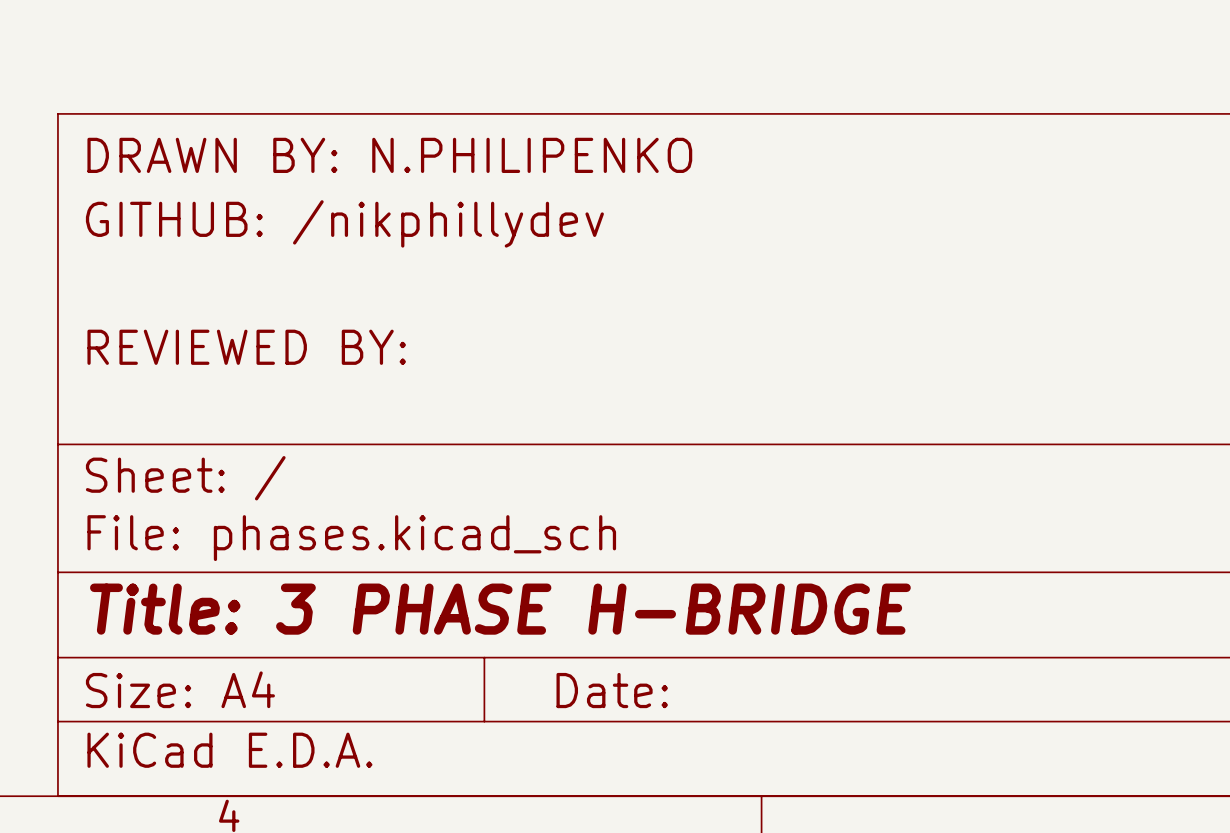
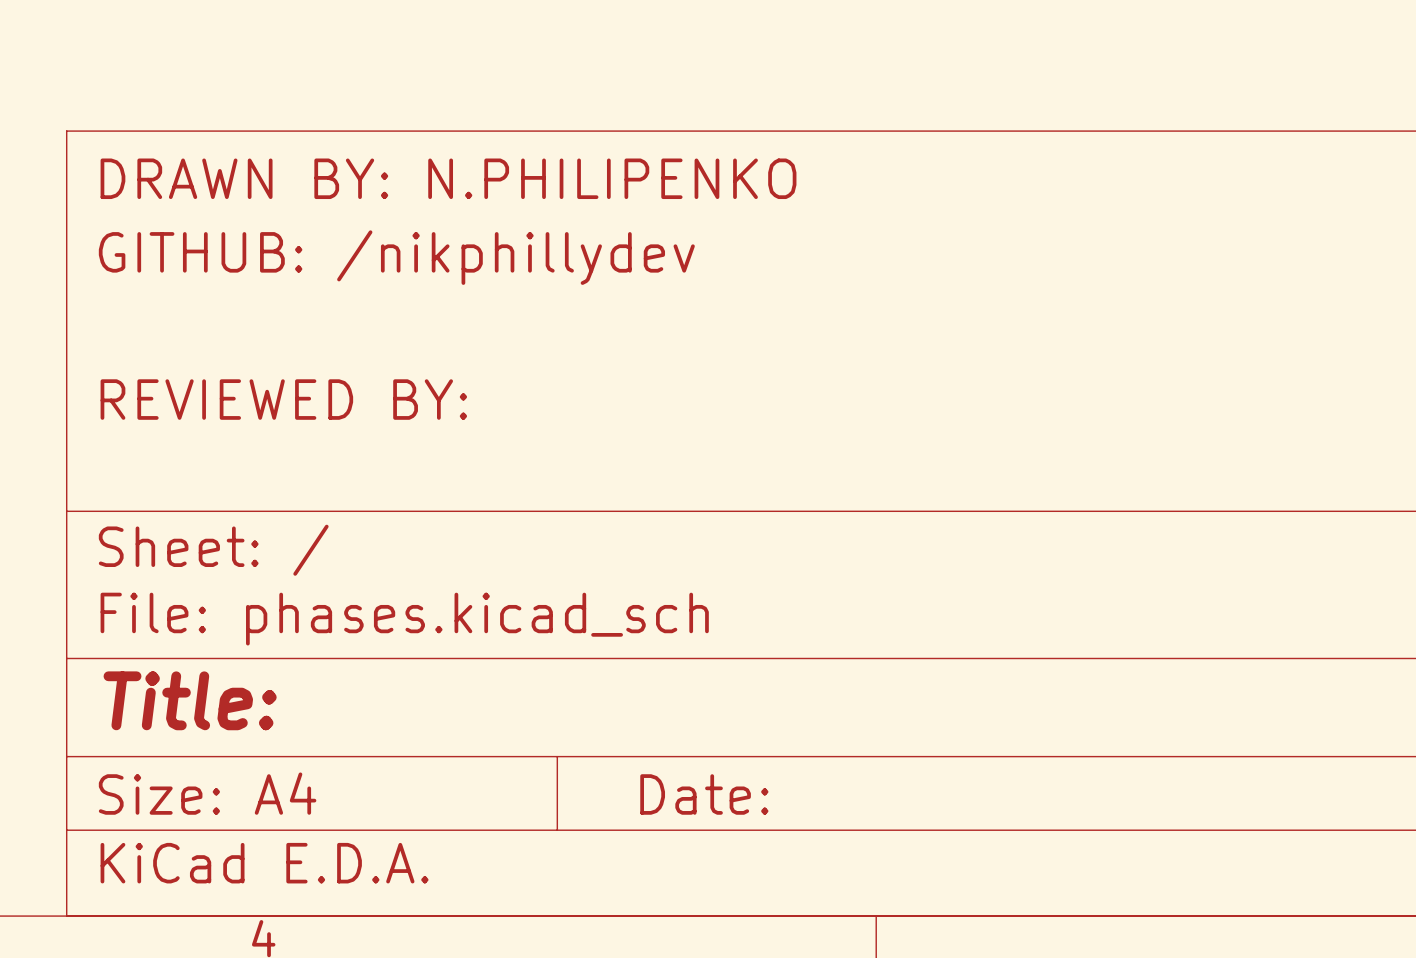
title block: Title: 3 PHASE H-BRIDGE (500, 609) -> Title: (190, 700)

